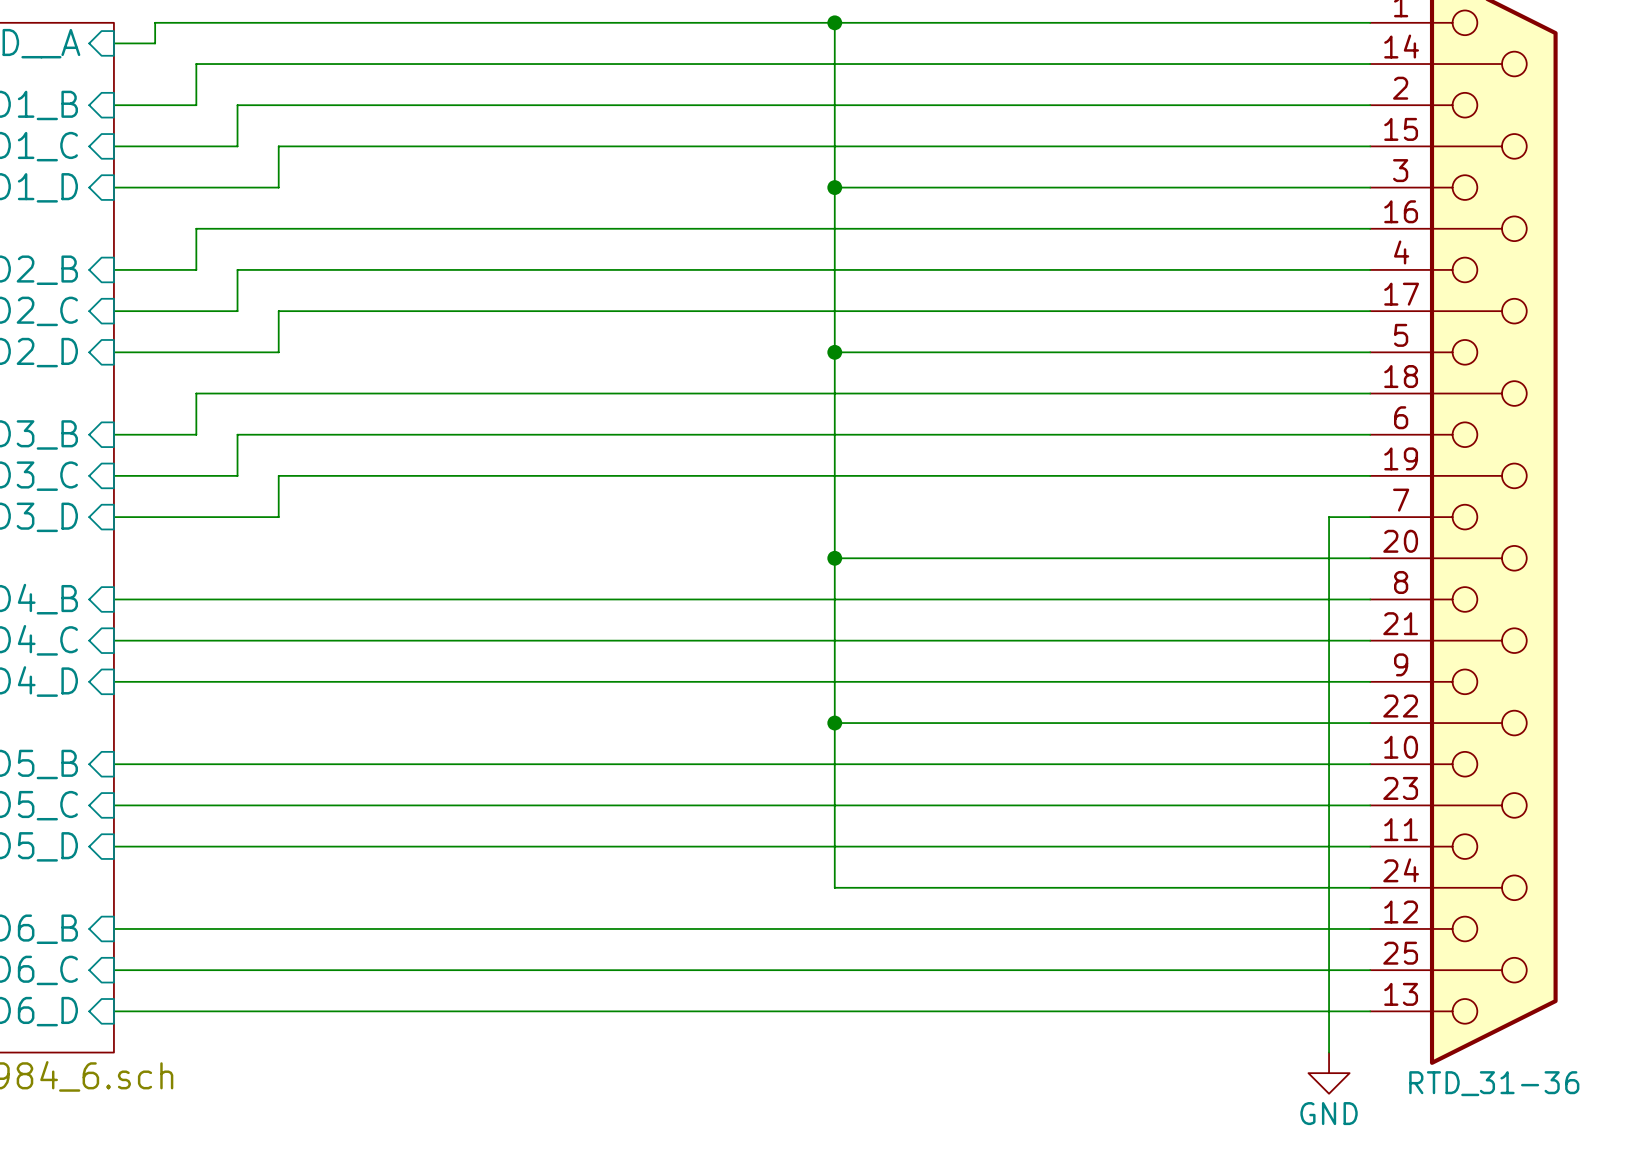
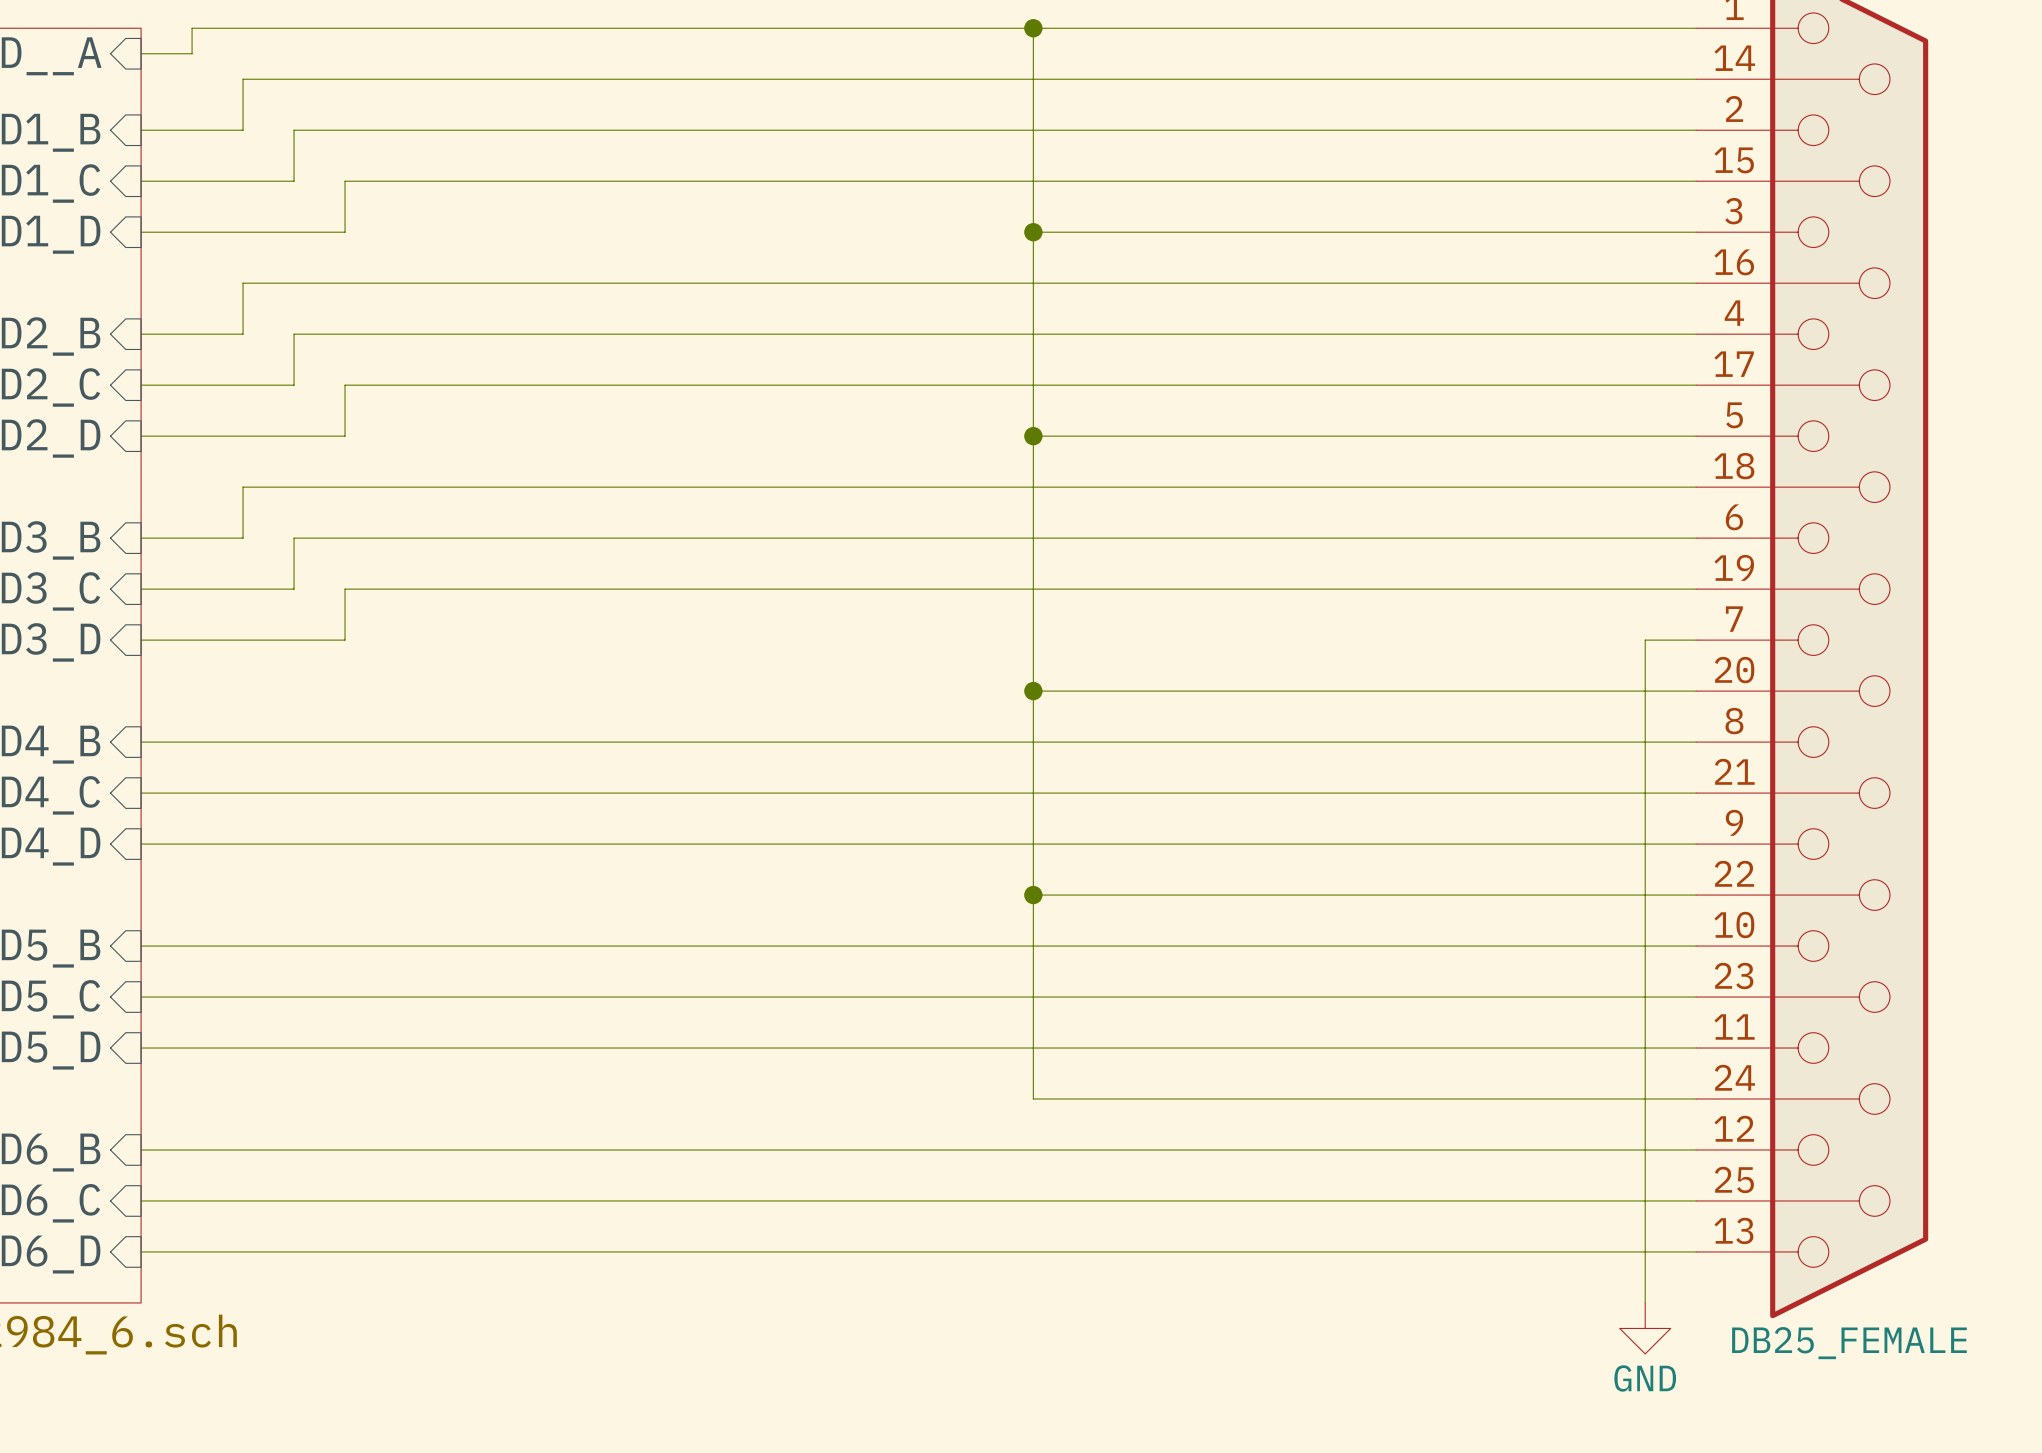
part value: RTD_31-36 (1494, 1083) -> DB25_FEMALE (1849, 1343)

